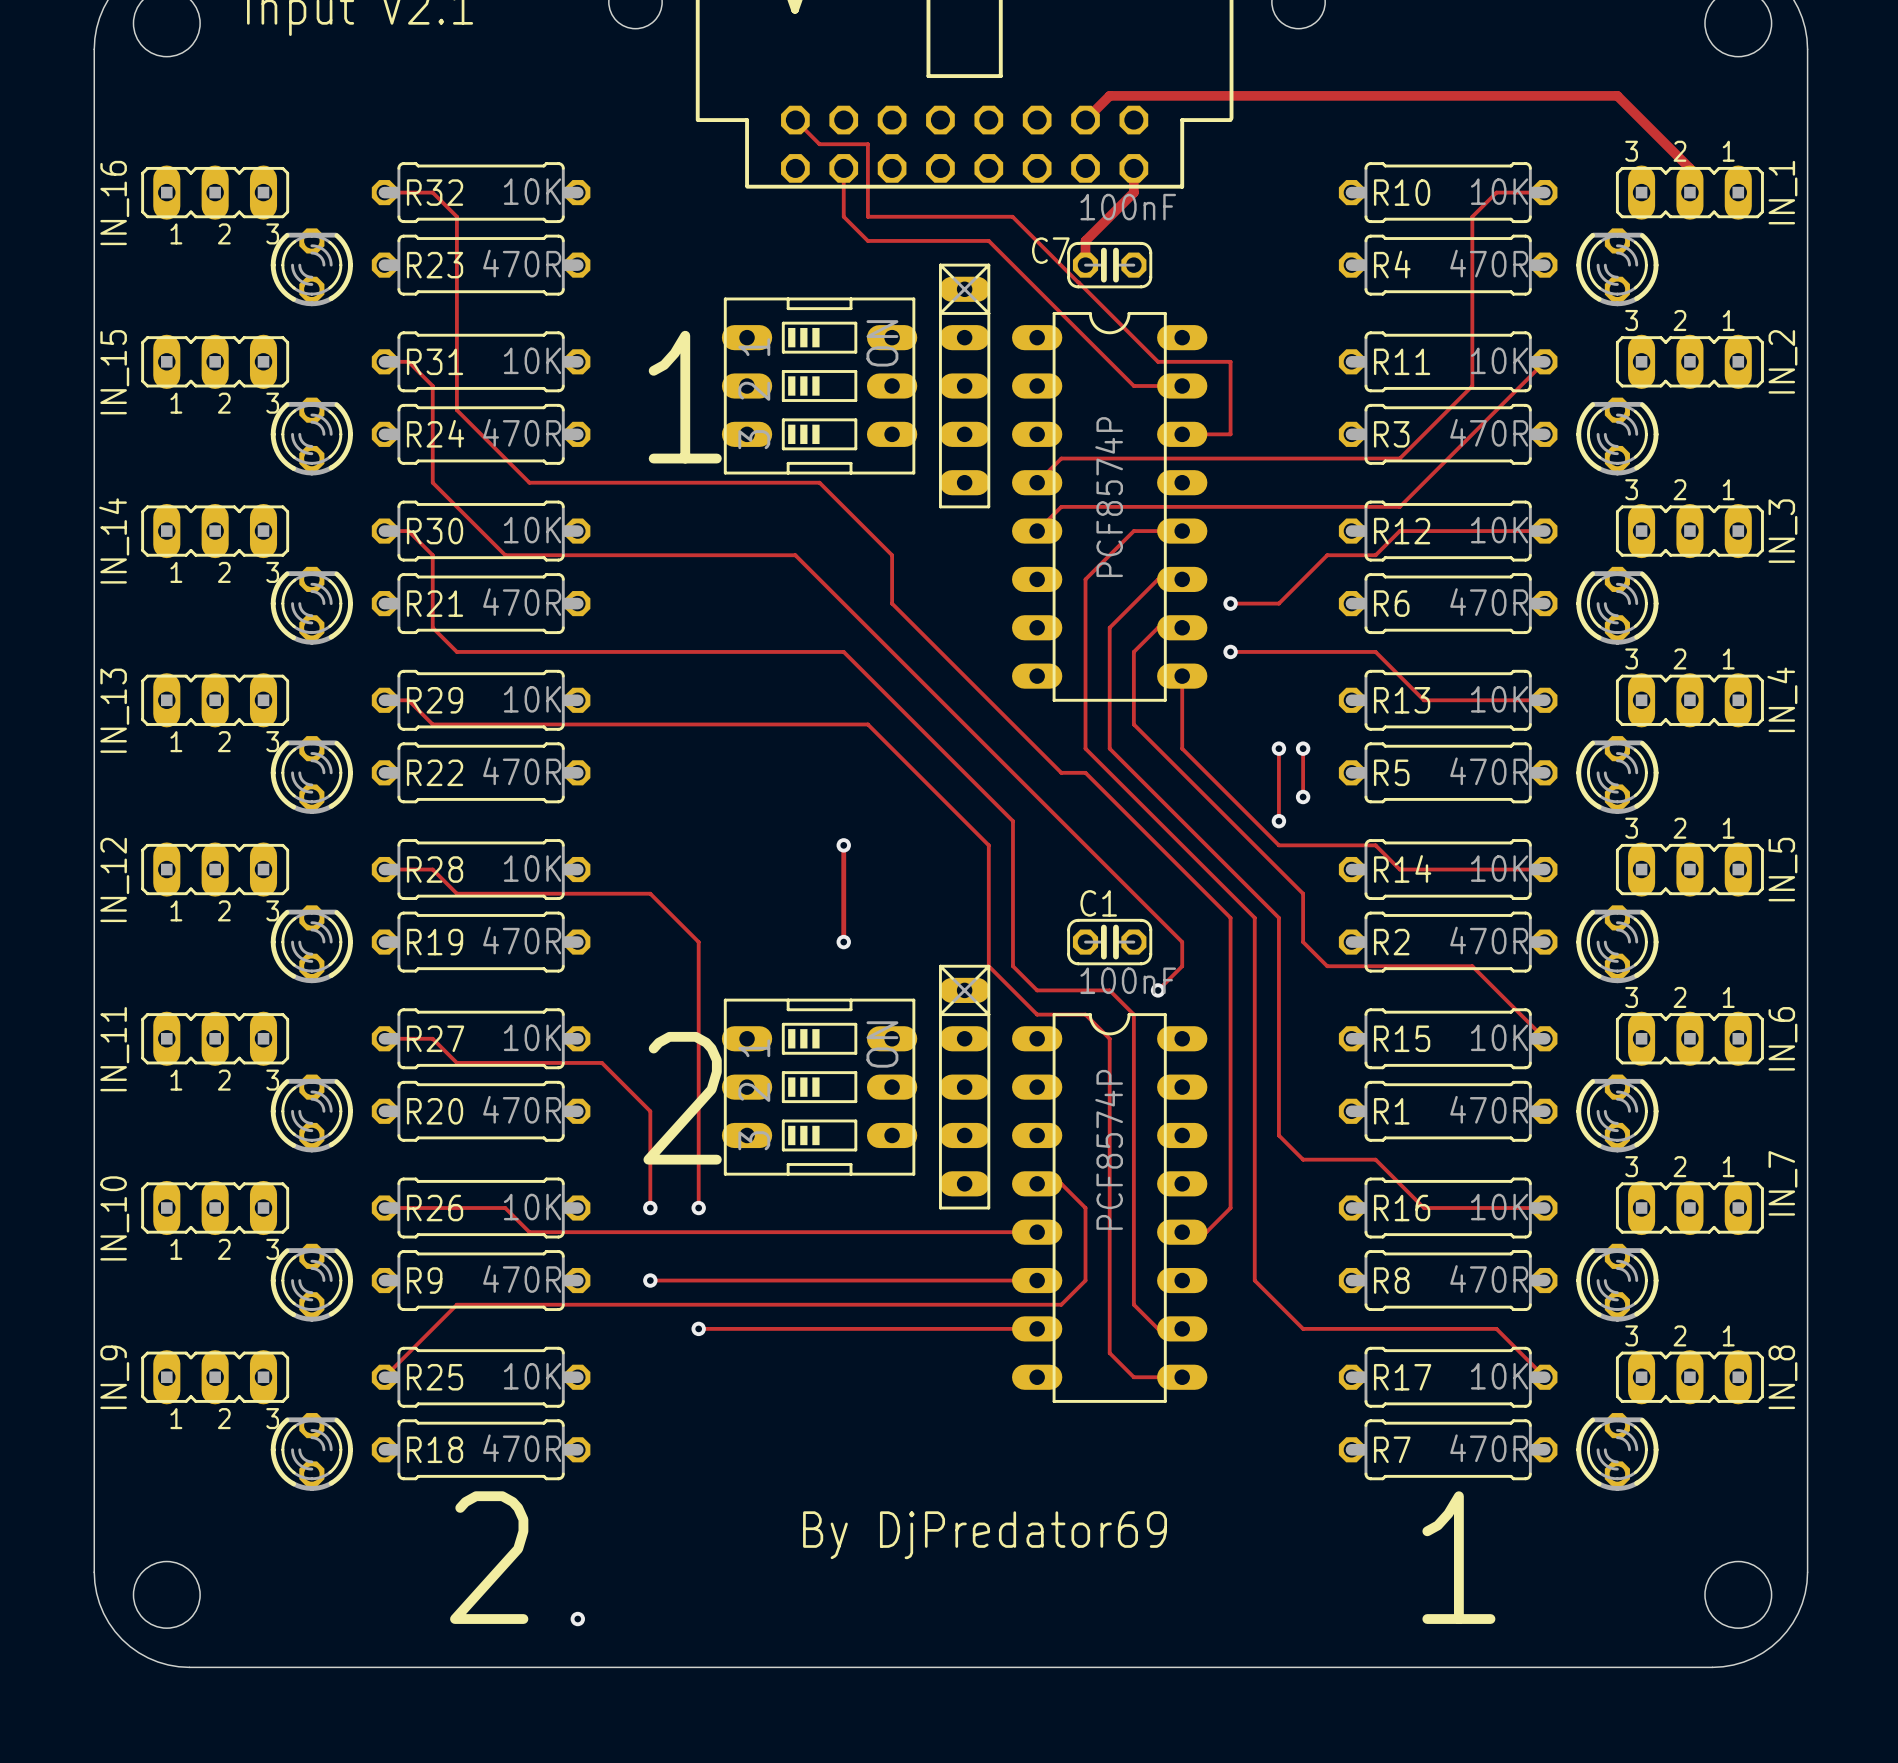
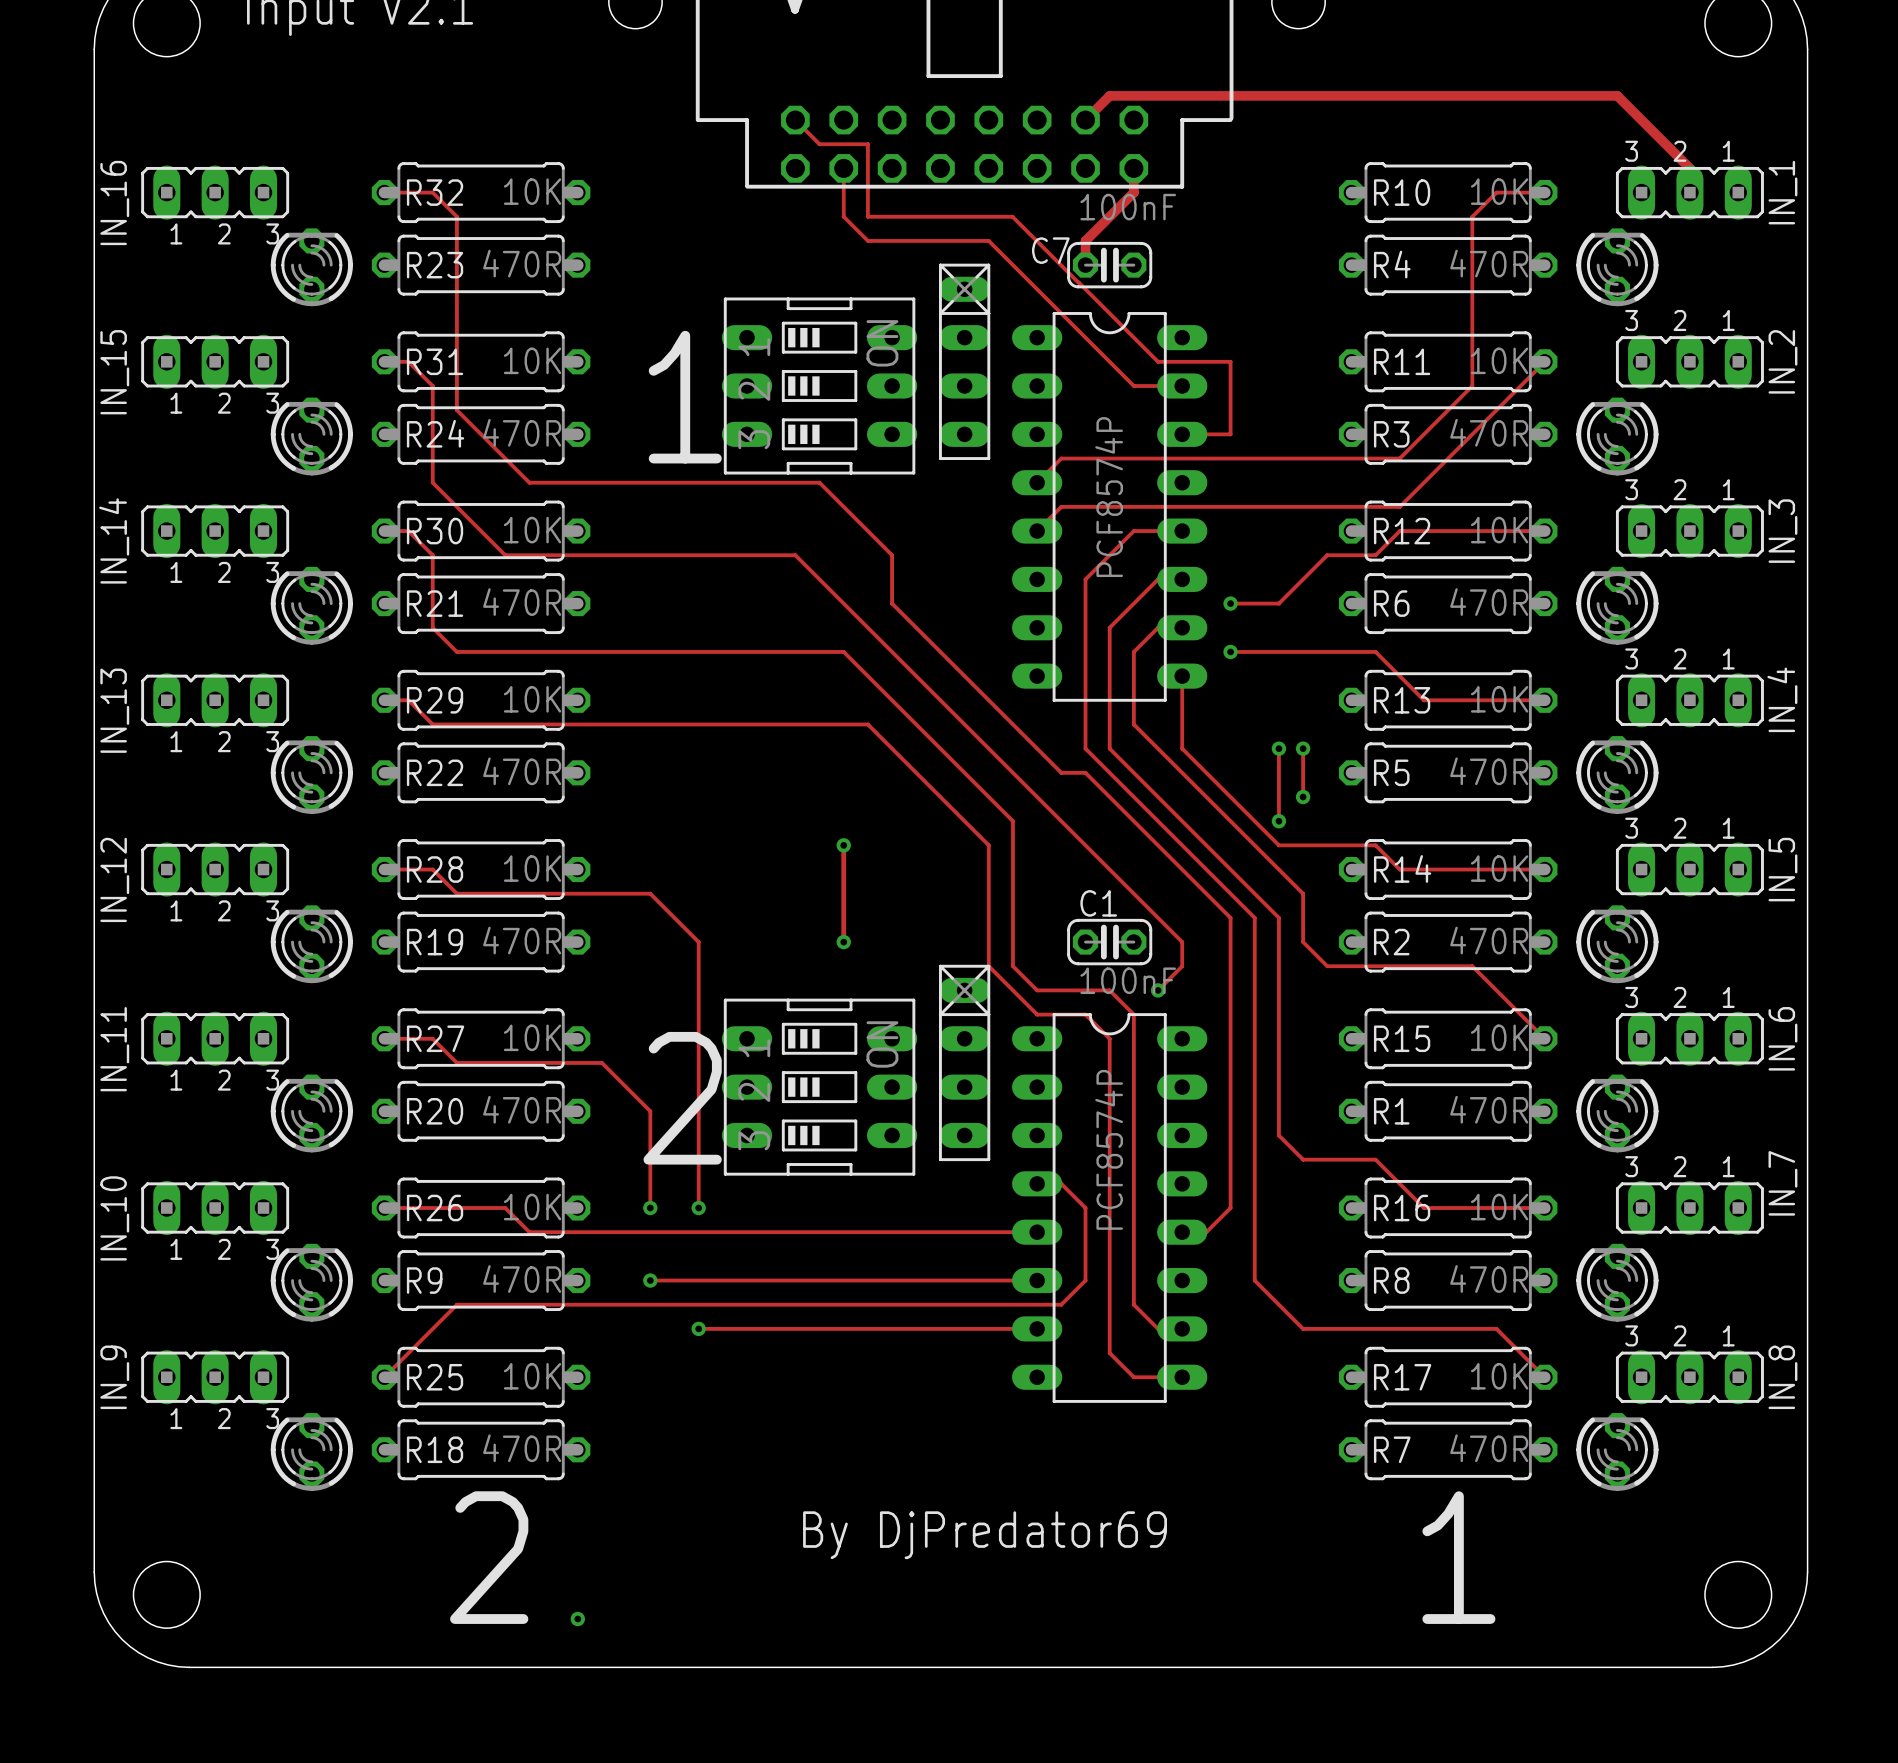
part: none -> (964, 361)
part: (964, 386) -> none
part: none -> (964, 1062)
part: (964, 1087) -> none

